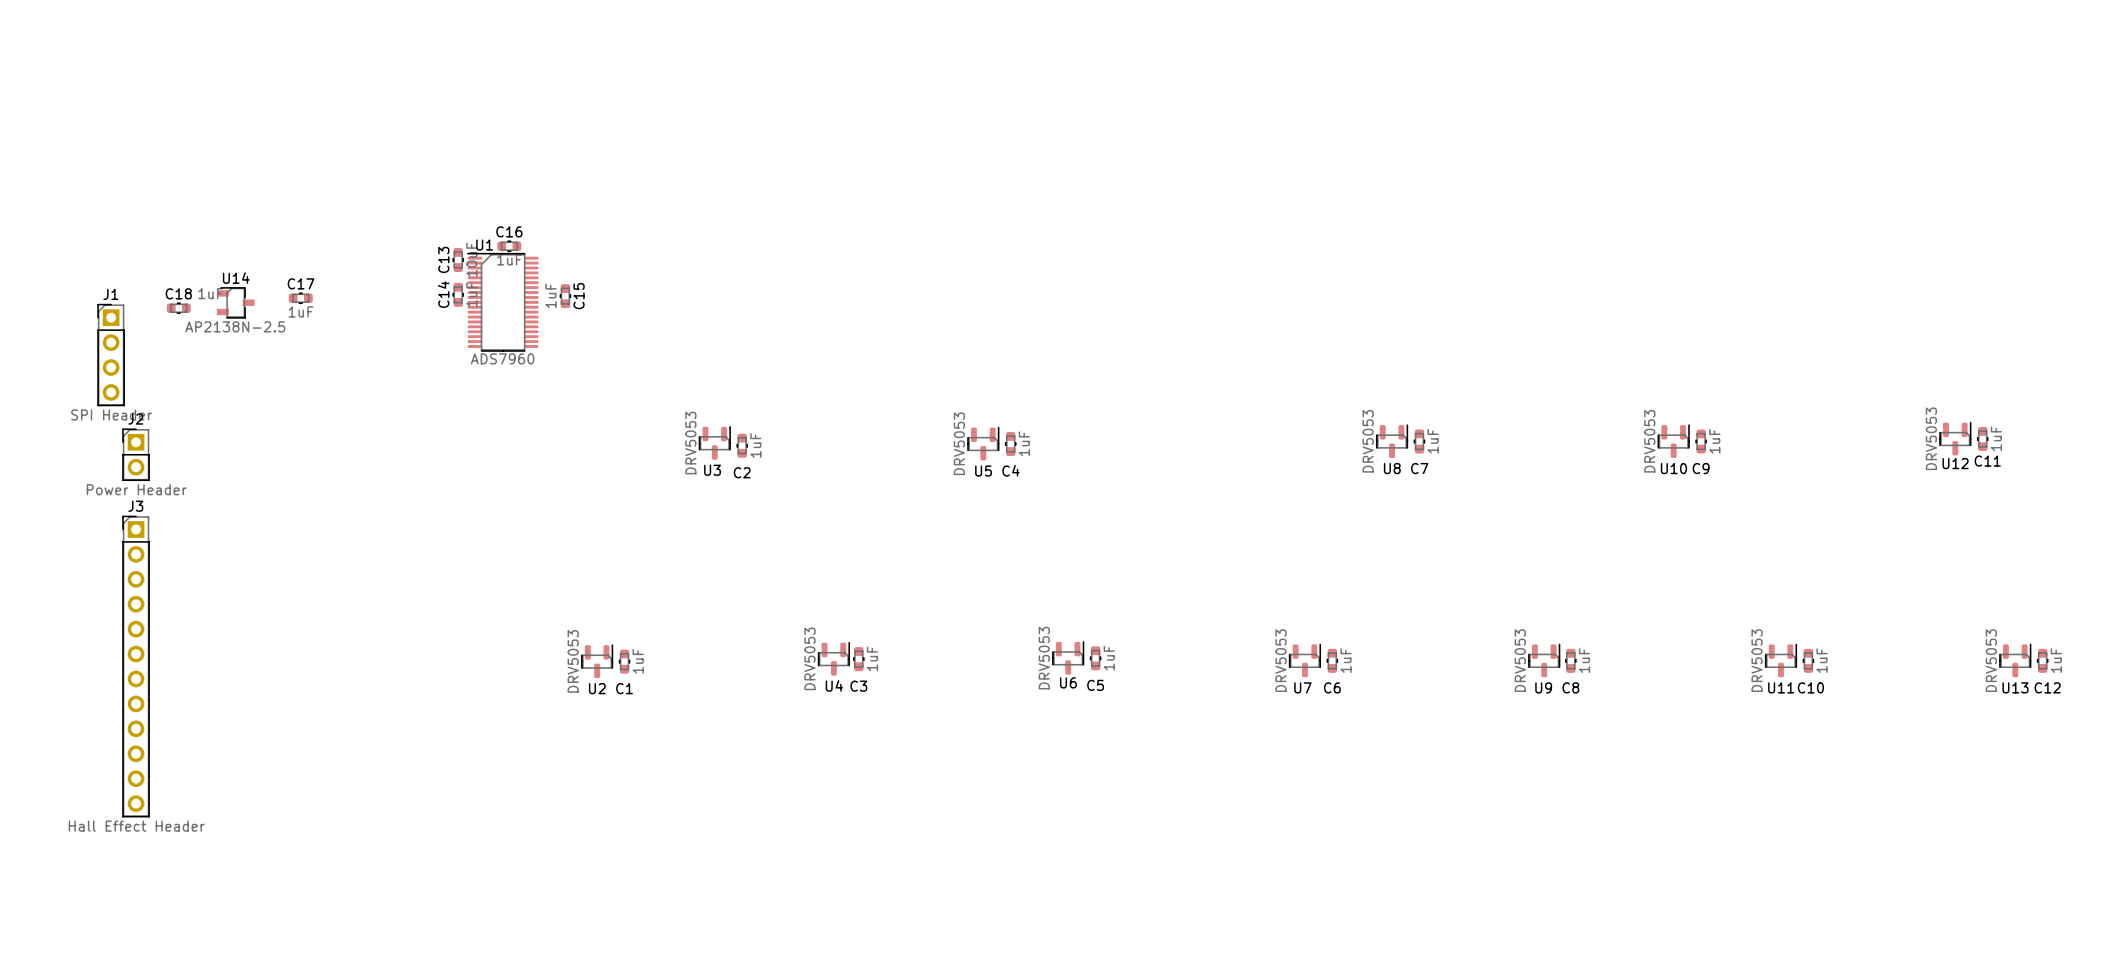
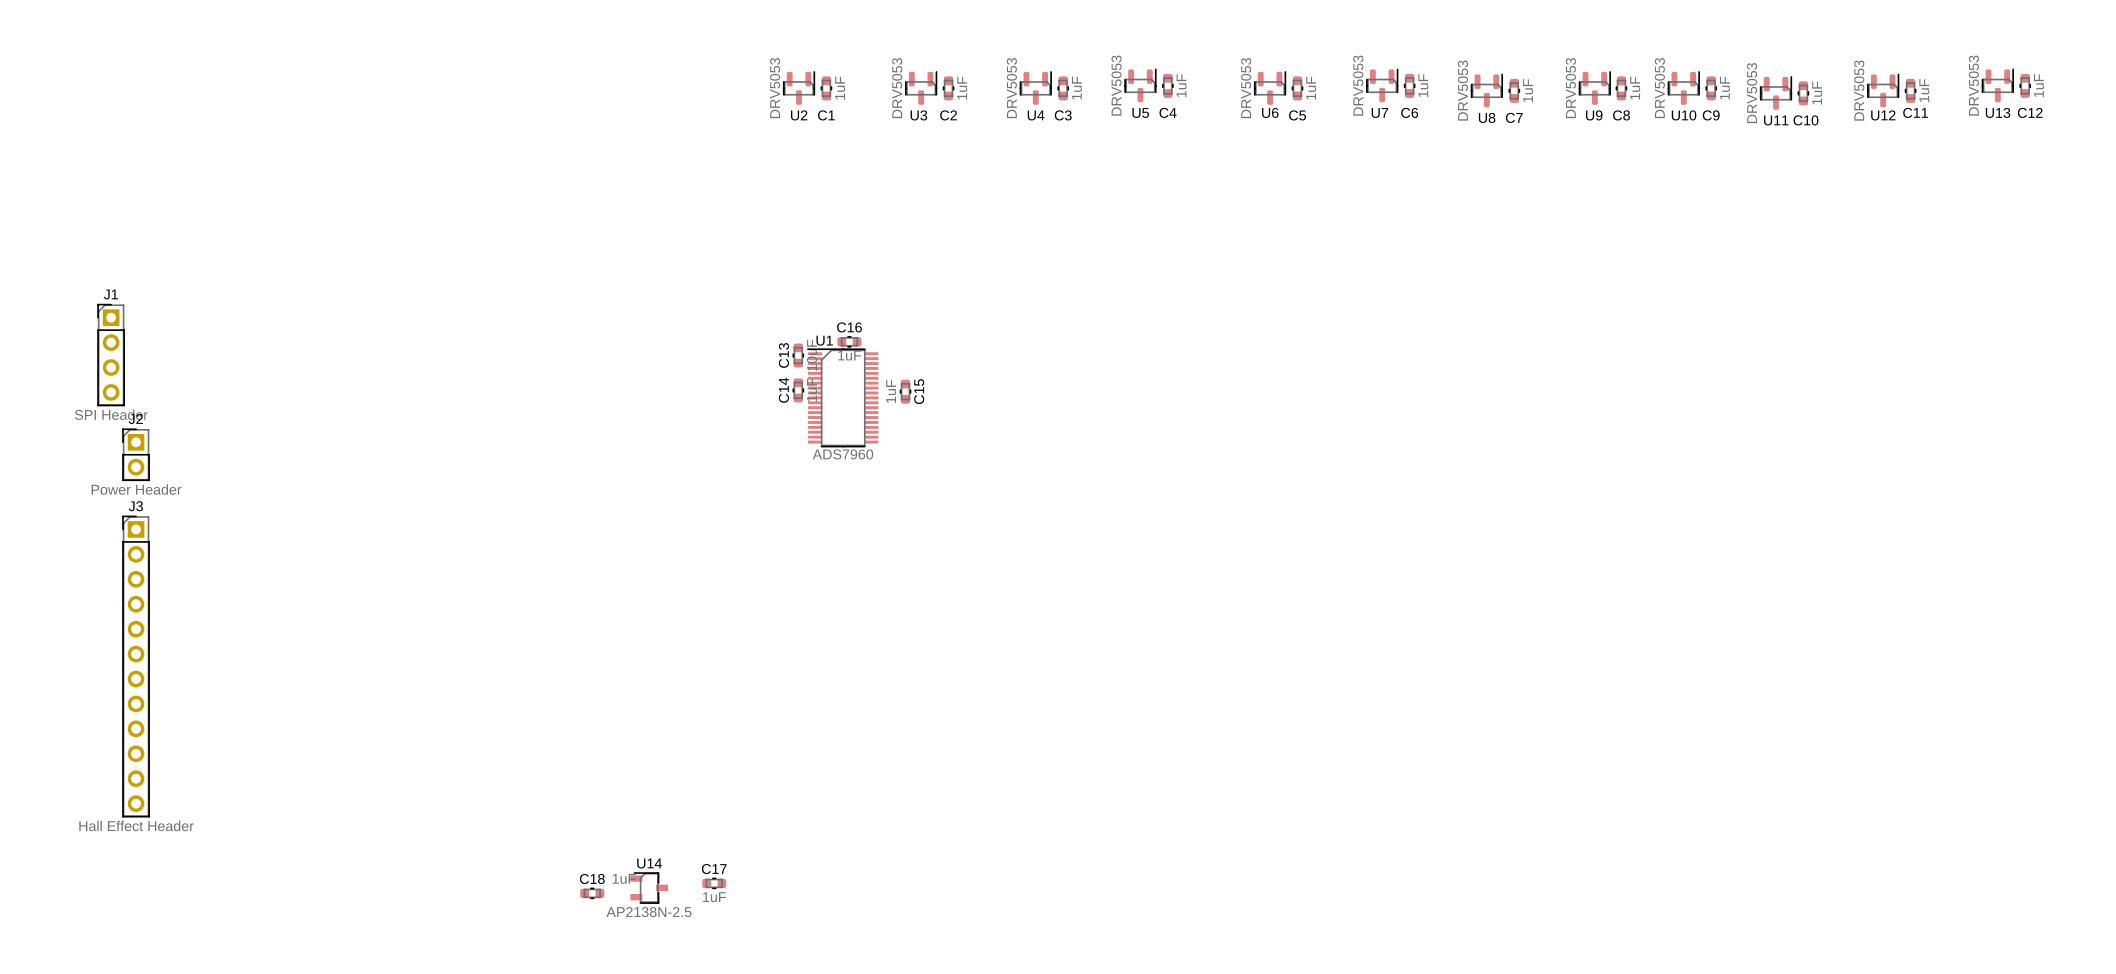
C16 position: (509, 246) -> (849, 341)
C13 position: (458, 259) -> (798, 355)
C14 position: (458, 294) -> (798, 390)
C15 position: (565, 296) -> (905, 391)
C17 position: (300, 298) -> (714, 883)
U14 position: (235, 302) -> (649, 888)
U1 position: (502, 302) -> (842, 397)
C18 position: (178, 308) -> (592, 893)
U12 position: (1955, 438) -> (1883, 90)
C11 position: (1982, 439) -> (1910, 90)
U8 position: (1392, 441) -> (1486, 90)
C7 position: (1419, 441) -> (1514, 90)
U10 position: (1673, 441) -> (1683, 88)
C9 position: (1701, 441) -> (1711, 88)
U3 position: (714, 442) -> (921, 88)
U5 position: (983, 443) -> (1140, 85)
C4 position: (1010, 444) -> (1167, 85)
C2 position: (742, 445) -> (948, 88)
U4 position: (833, 658) -> (1035, 88)
U6 position: (1068, 658) -> (1270, 88)
C5 position: (1095, 658) -> (1297, 88)
C3 position: (858, 659) -> (1063, 88)
U7 position: (1304, 660) -> (1382, 85)
C6 position: (1332, 660) -> (1409, 85)
U9 position: (1544, 660) -> (1594, 88)
C8 position: (1570, 660) -> (1621, 88)
U11 position: (1780, 660) -> (1776, 93)
C10 position: (1808, 660) -> (1803, 93)
U13 position: (2015, 660) -> (1997, 85)
C12 position: (2042, 660) -> (2025, 85)
U2 position: (597, 661) -> (799, 88)
C1 position: (624, 661) -> (826, 88)

